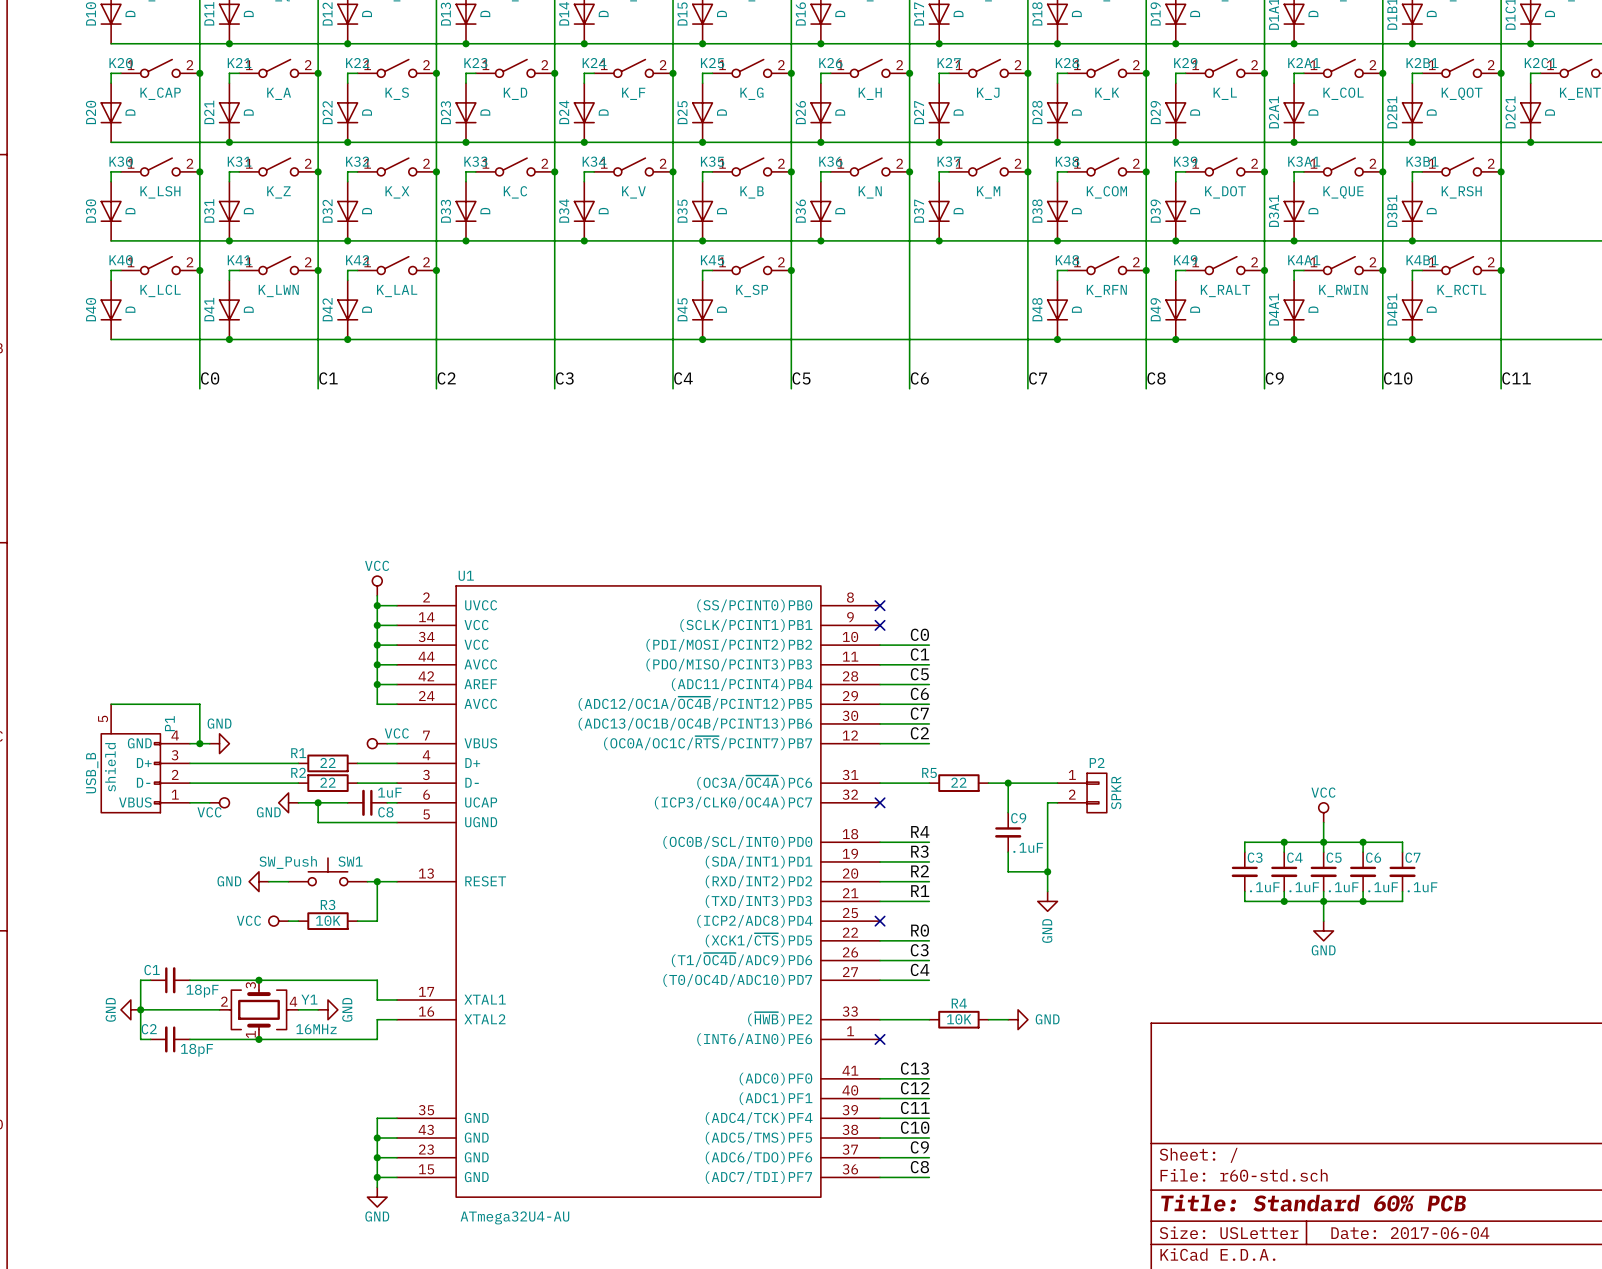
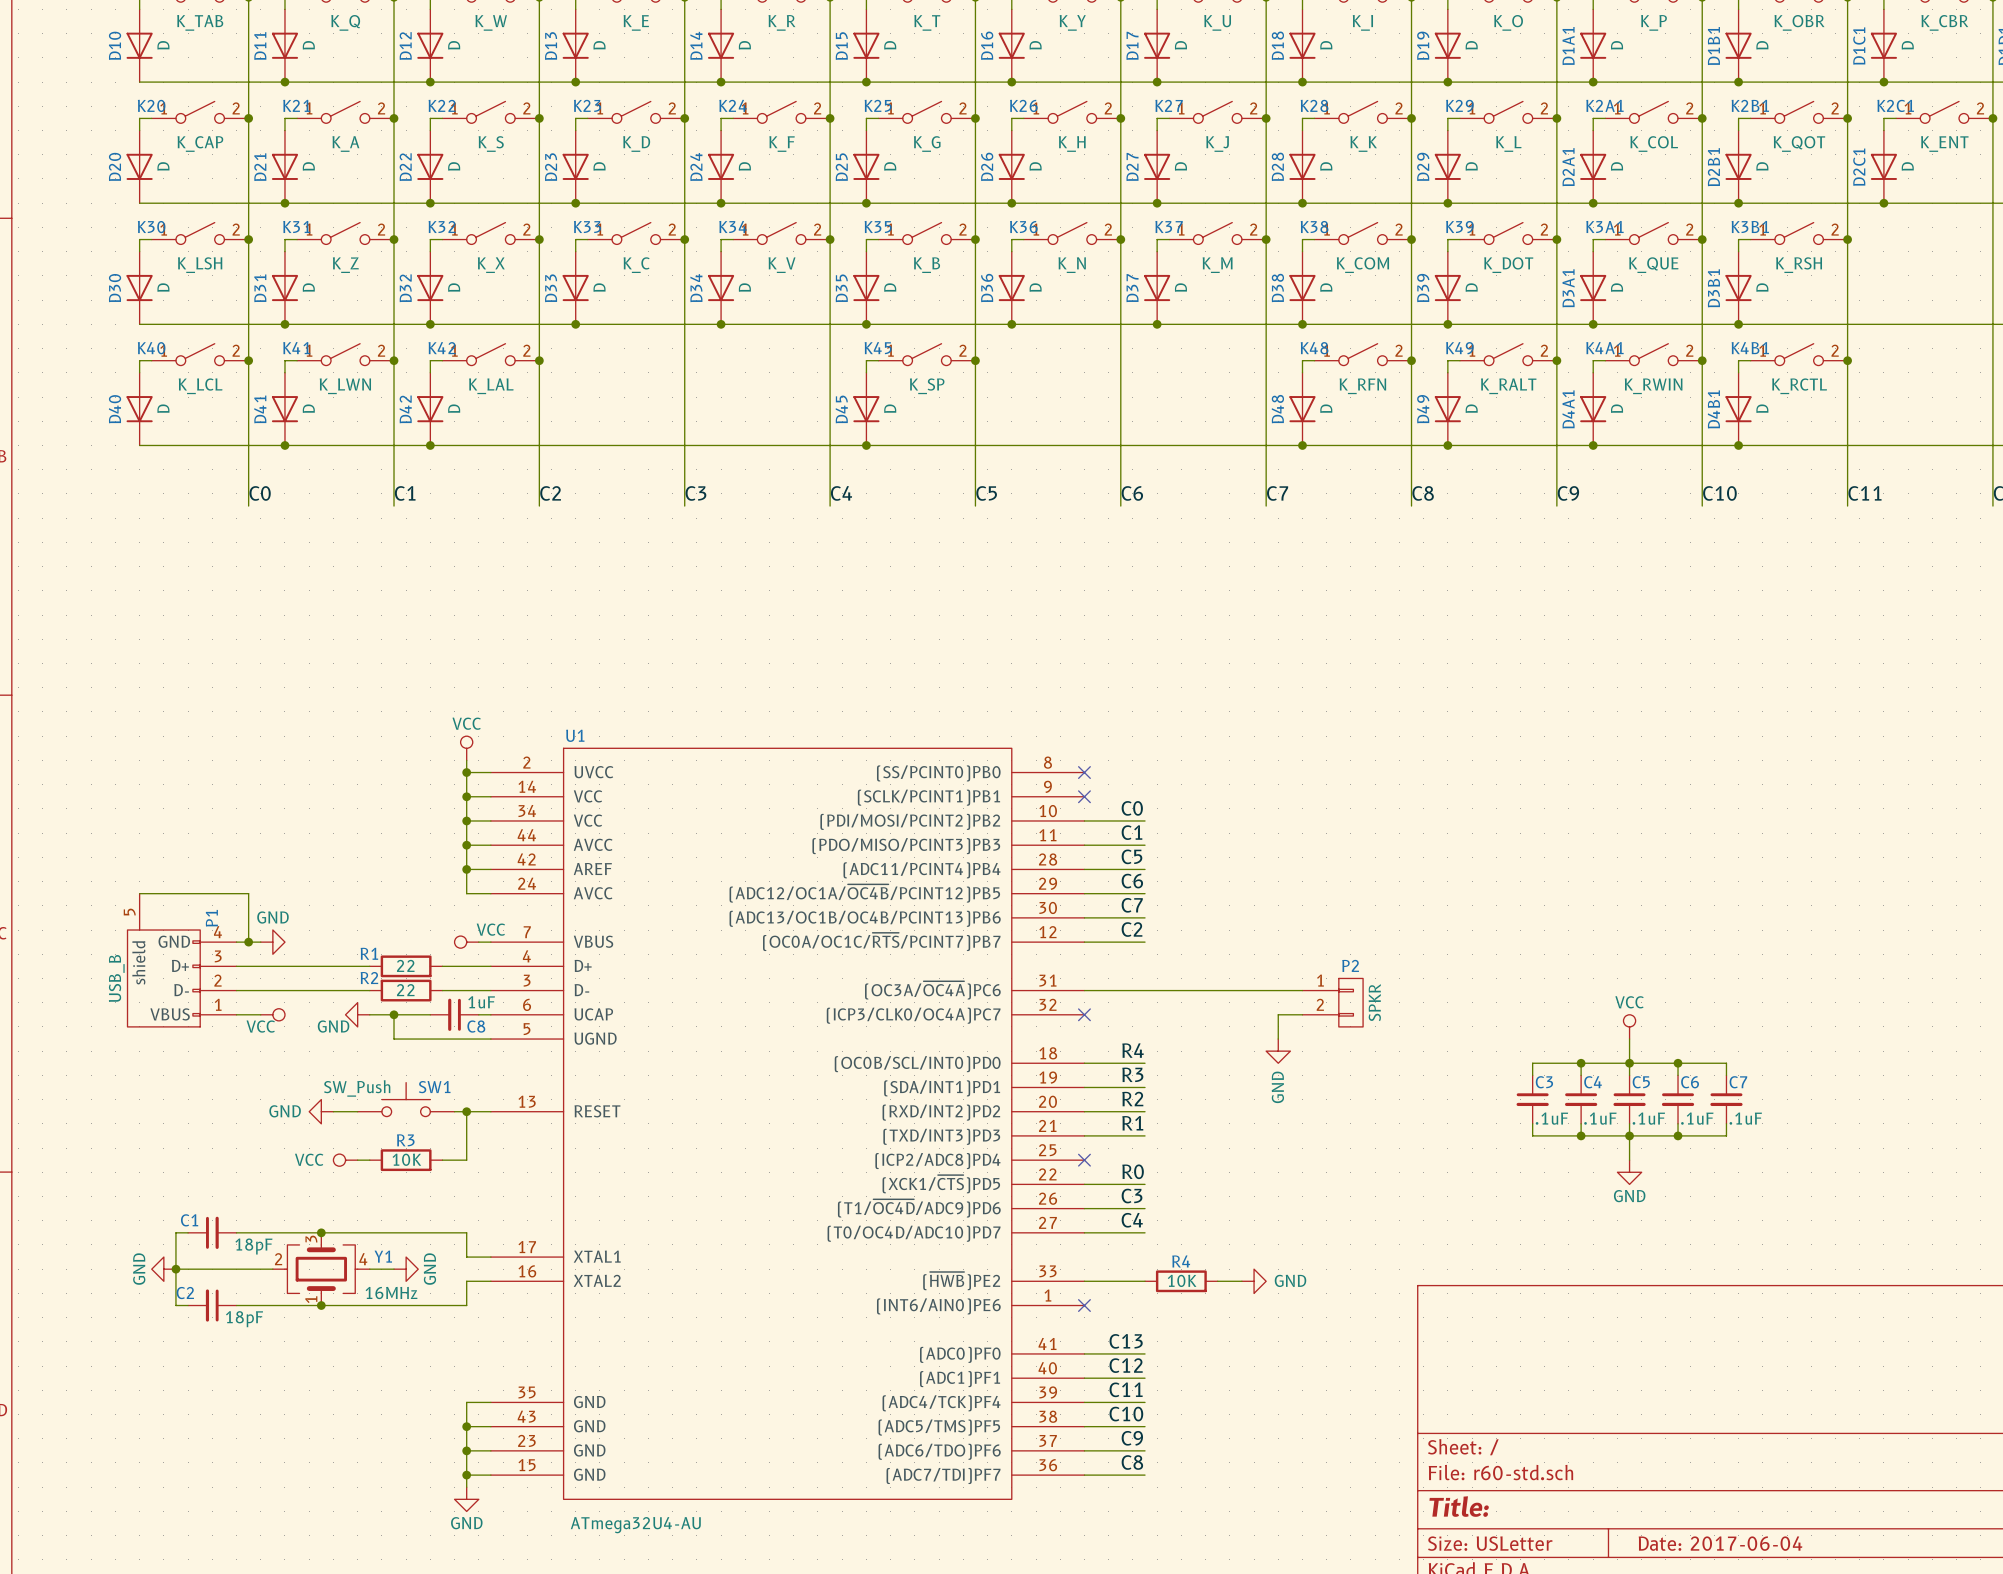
wire: none -> (1145, 990) (1217, 990)
R5: 22 (958, 783) -> none
wire: (1008, 783) (1008, 812) -> none
junction: (1008, 783) -> none
wire: (1047, 802) (1047, 891) -> (1290, 1014) (1278, 1014) (1278, 1039)
C9: .1uF (1008, 832) -> none
wire: (1008, 852) (1008, 871) (1047, 871) -> none
junction: (1047, 871) -> none
power symbol position: GND (1047, 901) -> GND (1278, 1051)
title block: Title: Standard 60% PCB (1313, 1203) -> Title: (1459, 1506)

